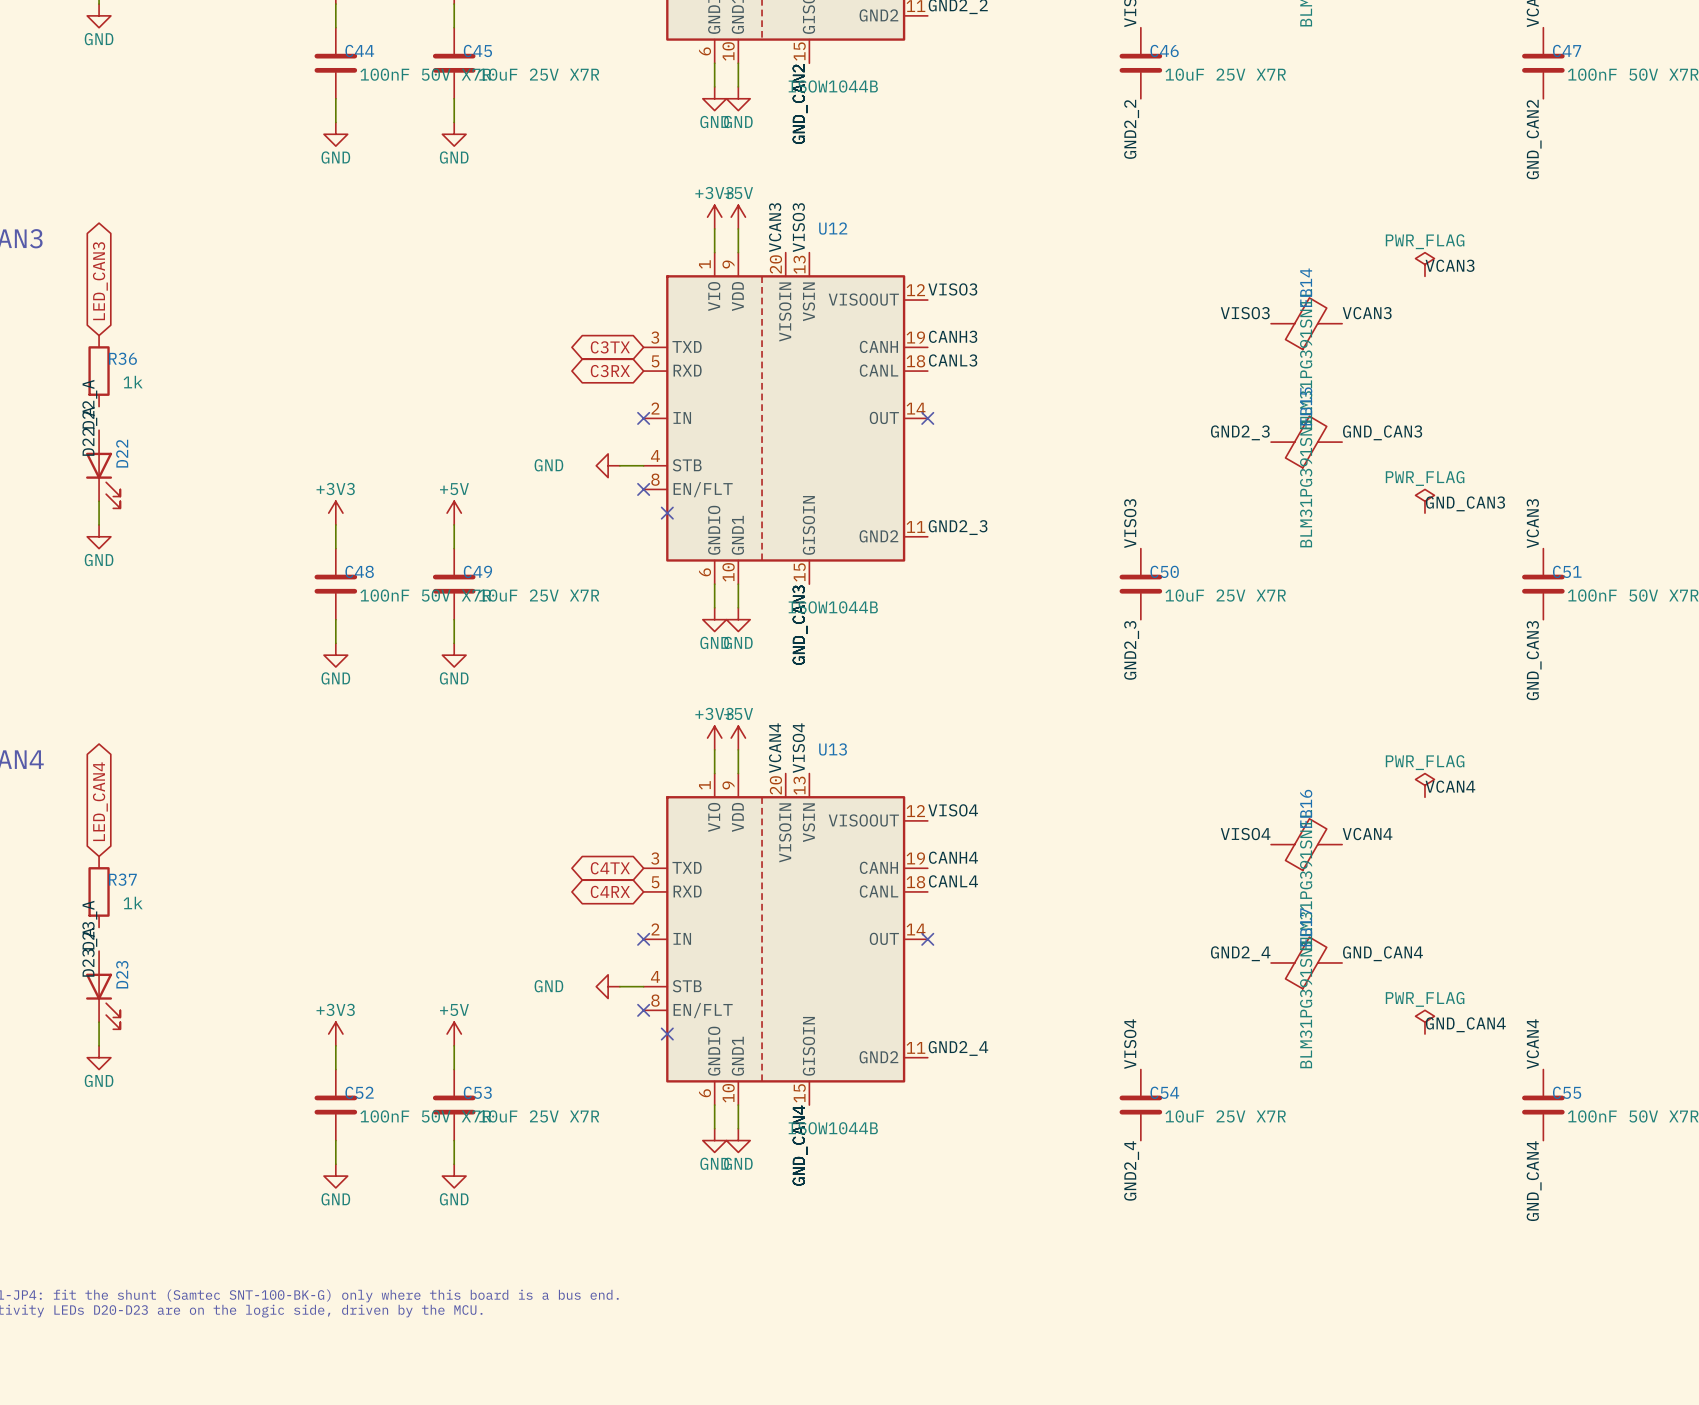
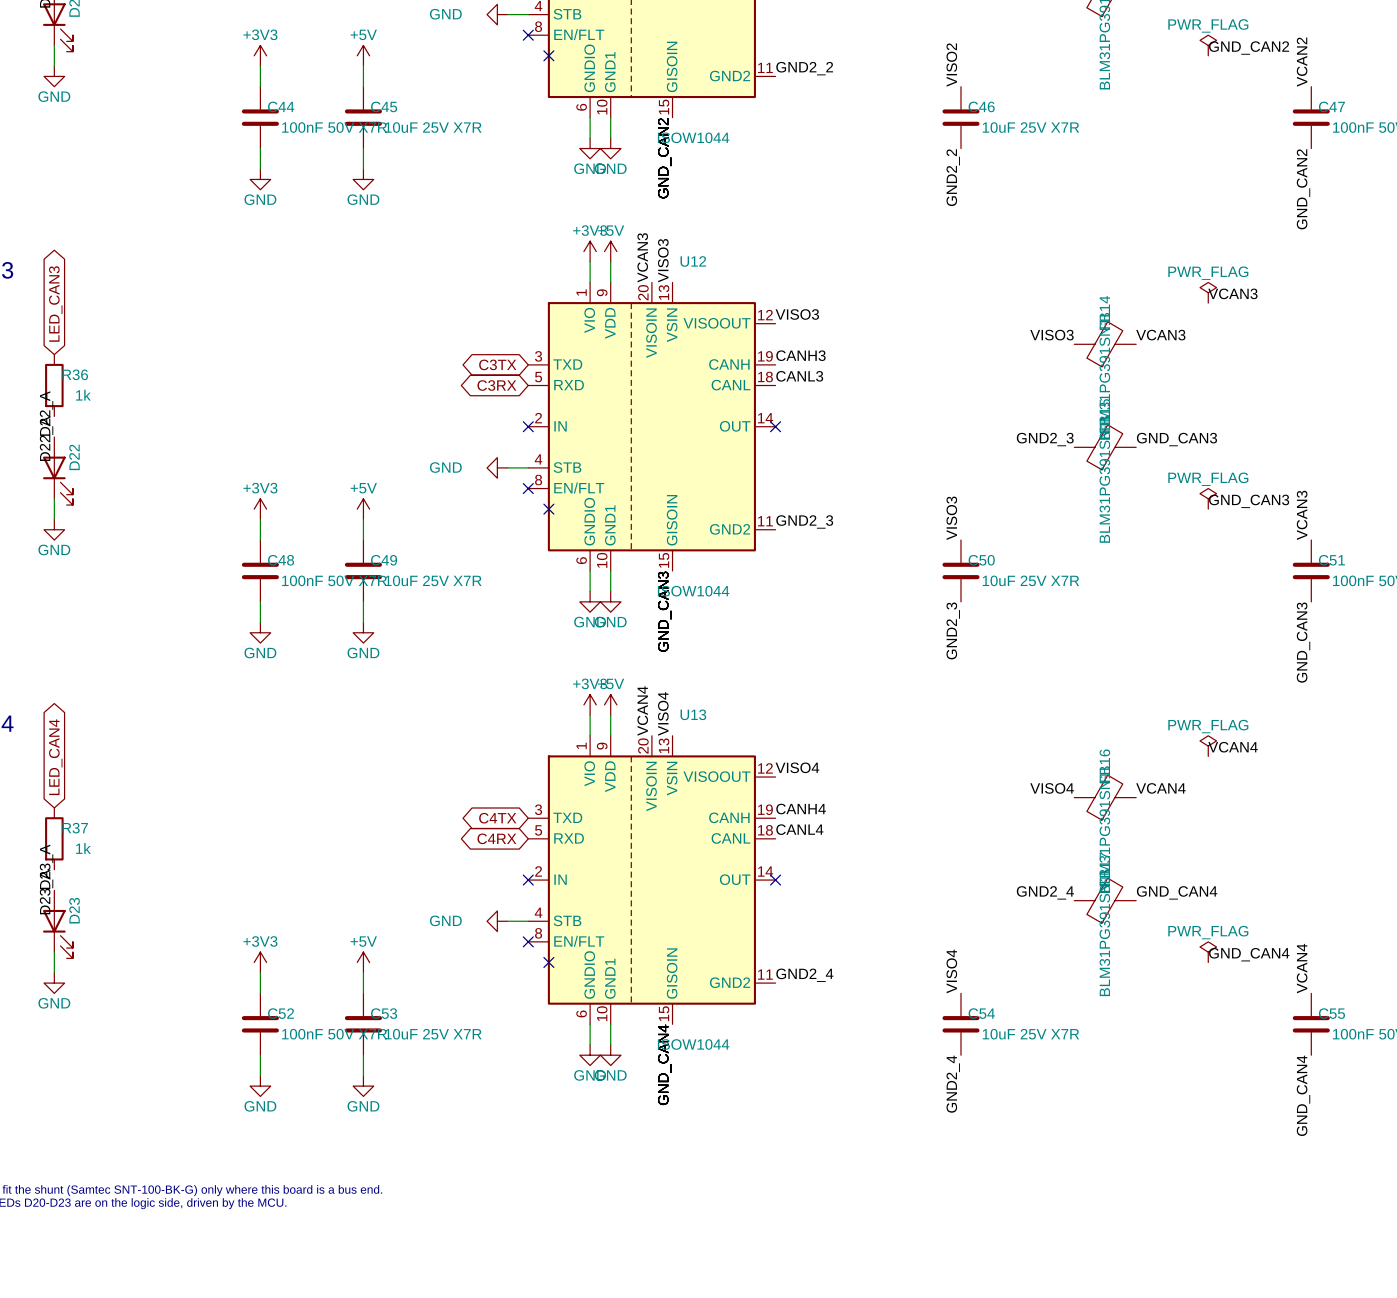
part value: ISOW1044B (833, 86) -> ISOW1044 (693, 137)
U12 value: ISOW1044B (833, 607) -> ISOW1044 (693, 591)
U13 value: ISOW1044B (833, 1128) -> ISOW1044 (693, 1044)

